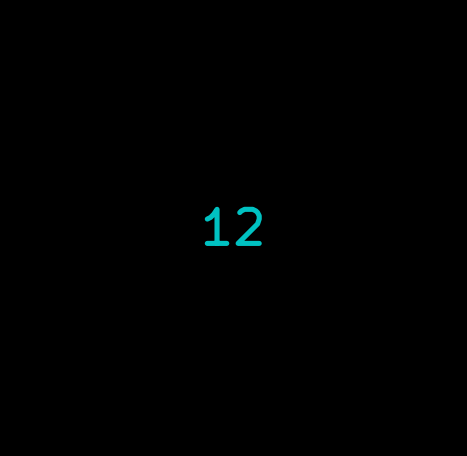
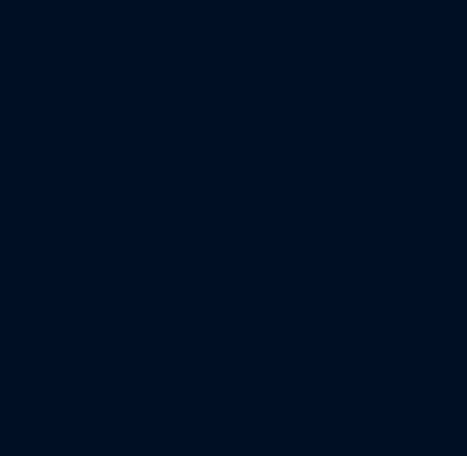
drawing: [204, 206, 262, 246] -> none

